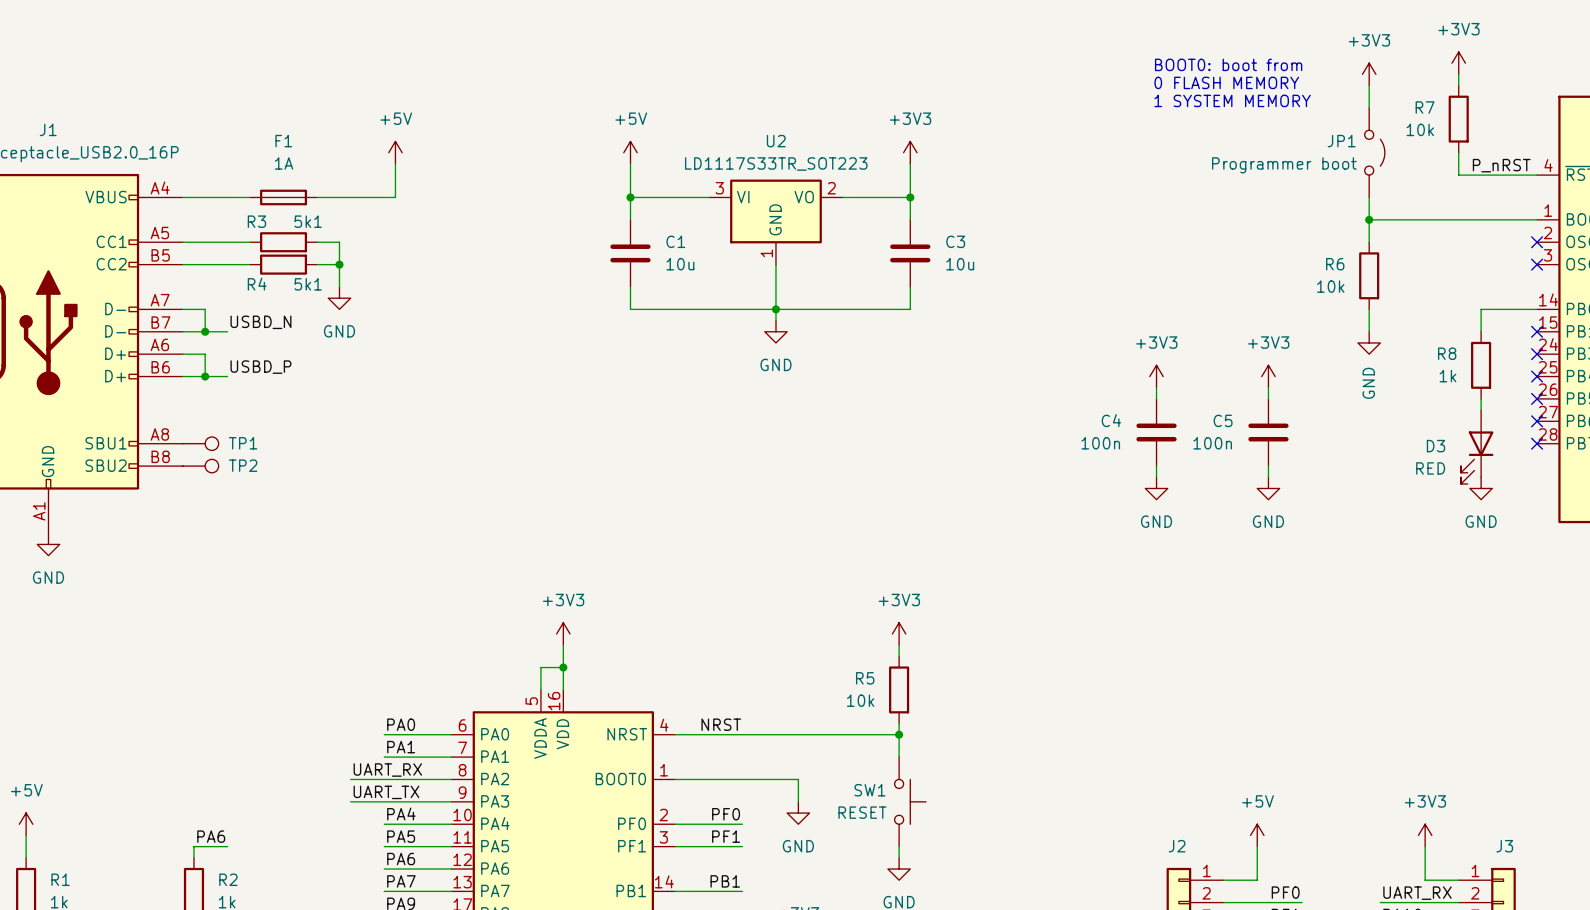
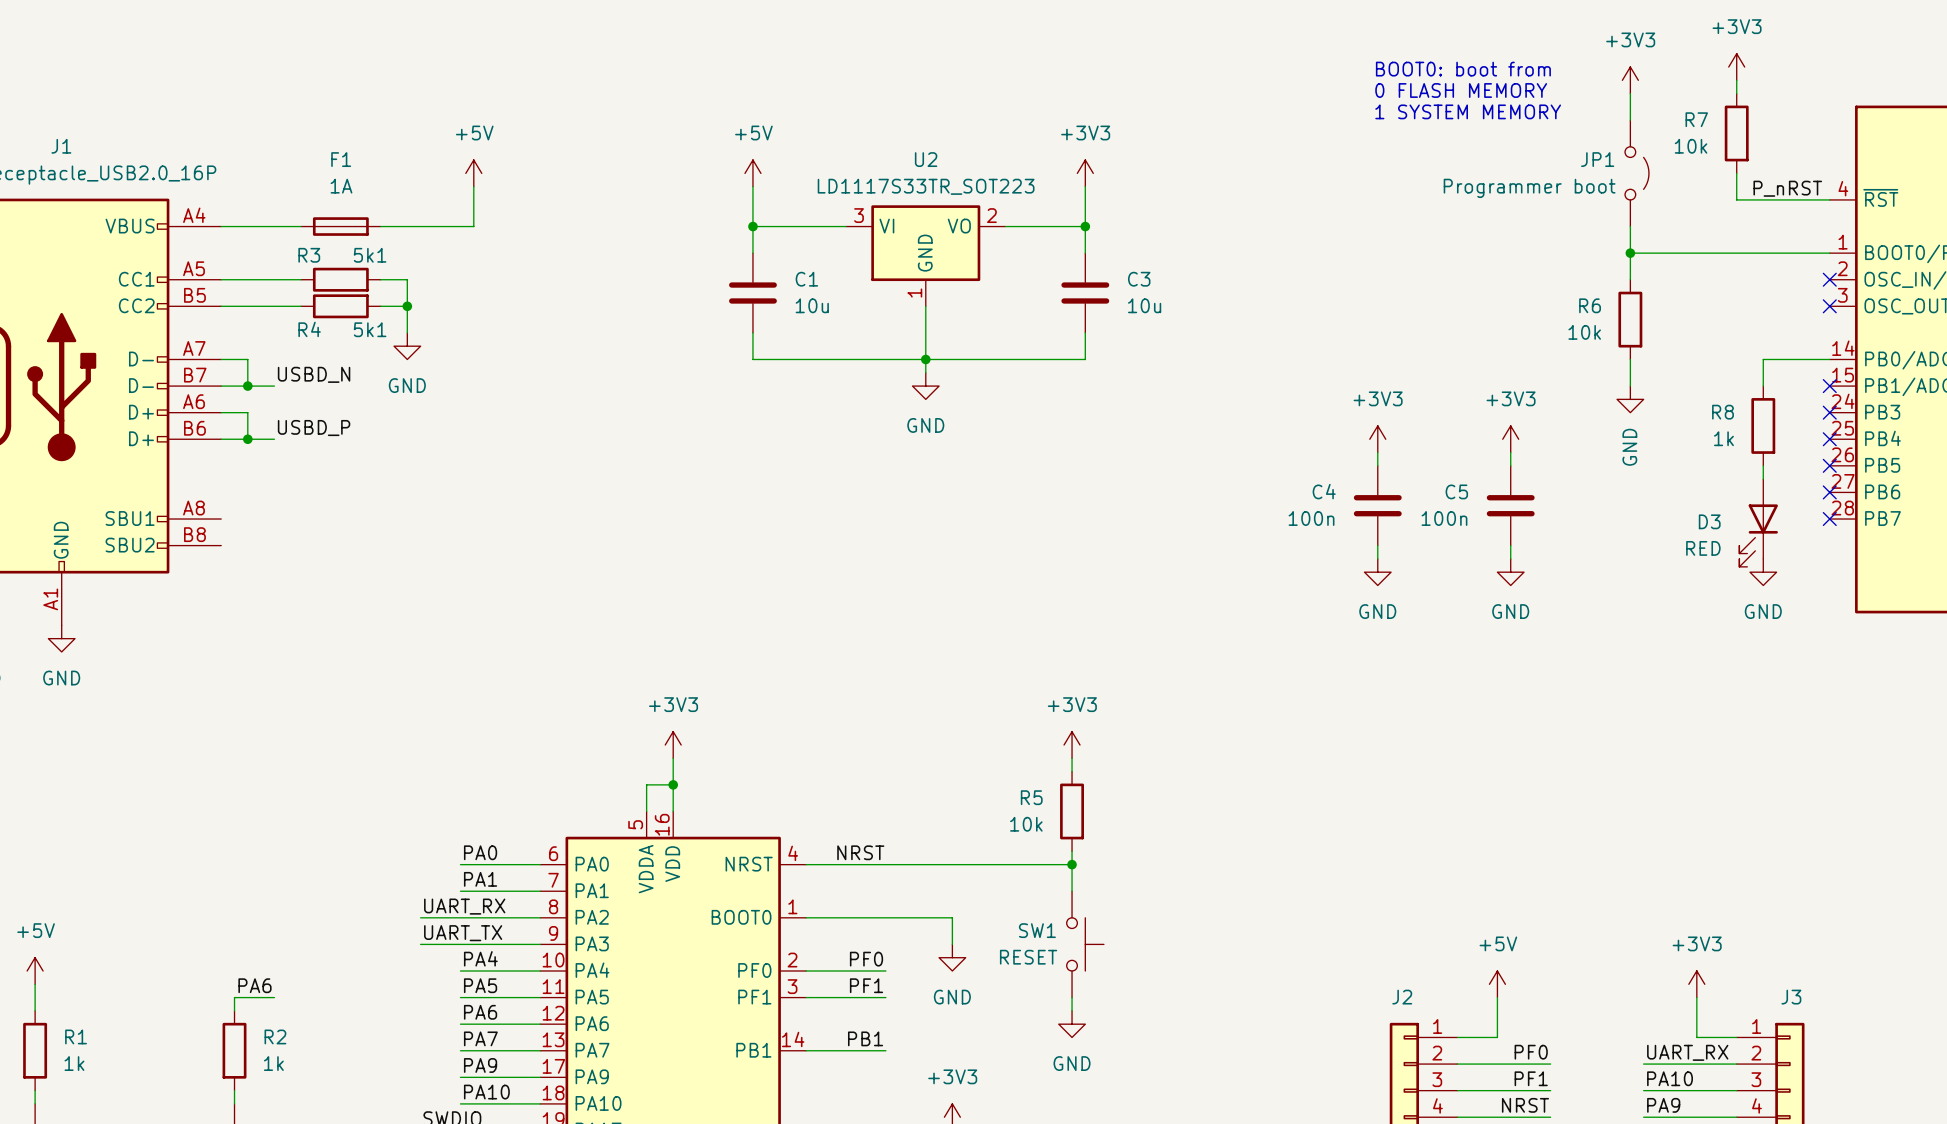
TP1: (200, 443) -> none
TP2: (200, 466) -> none

